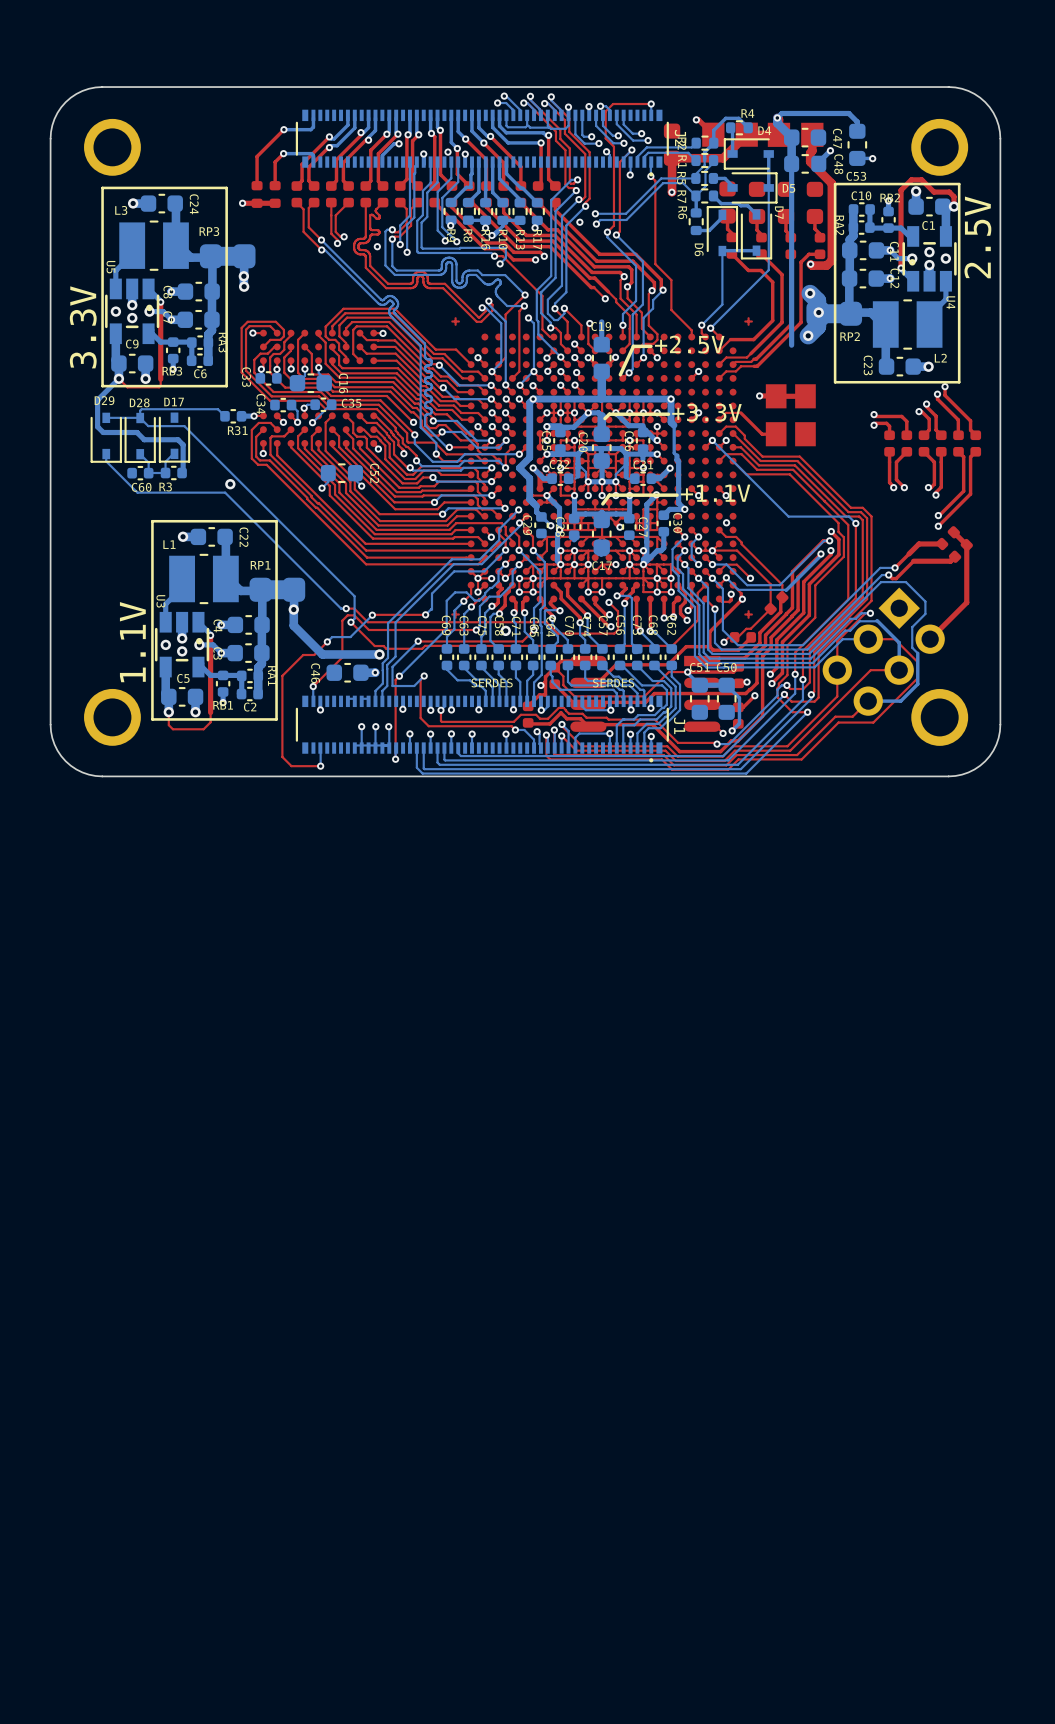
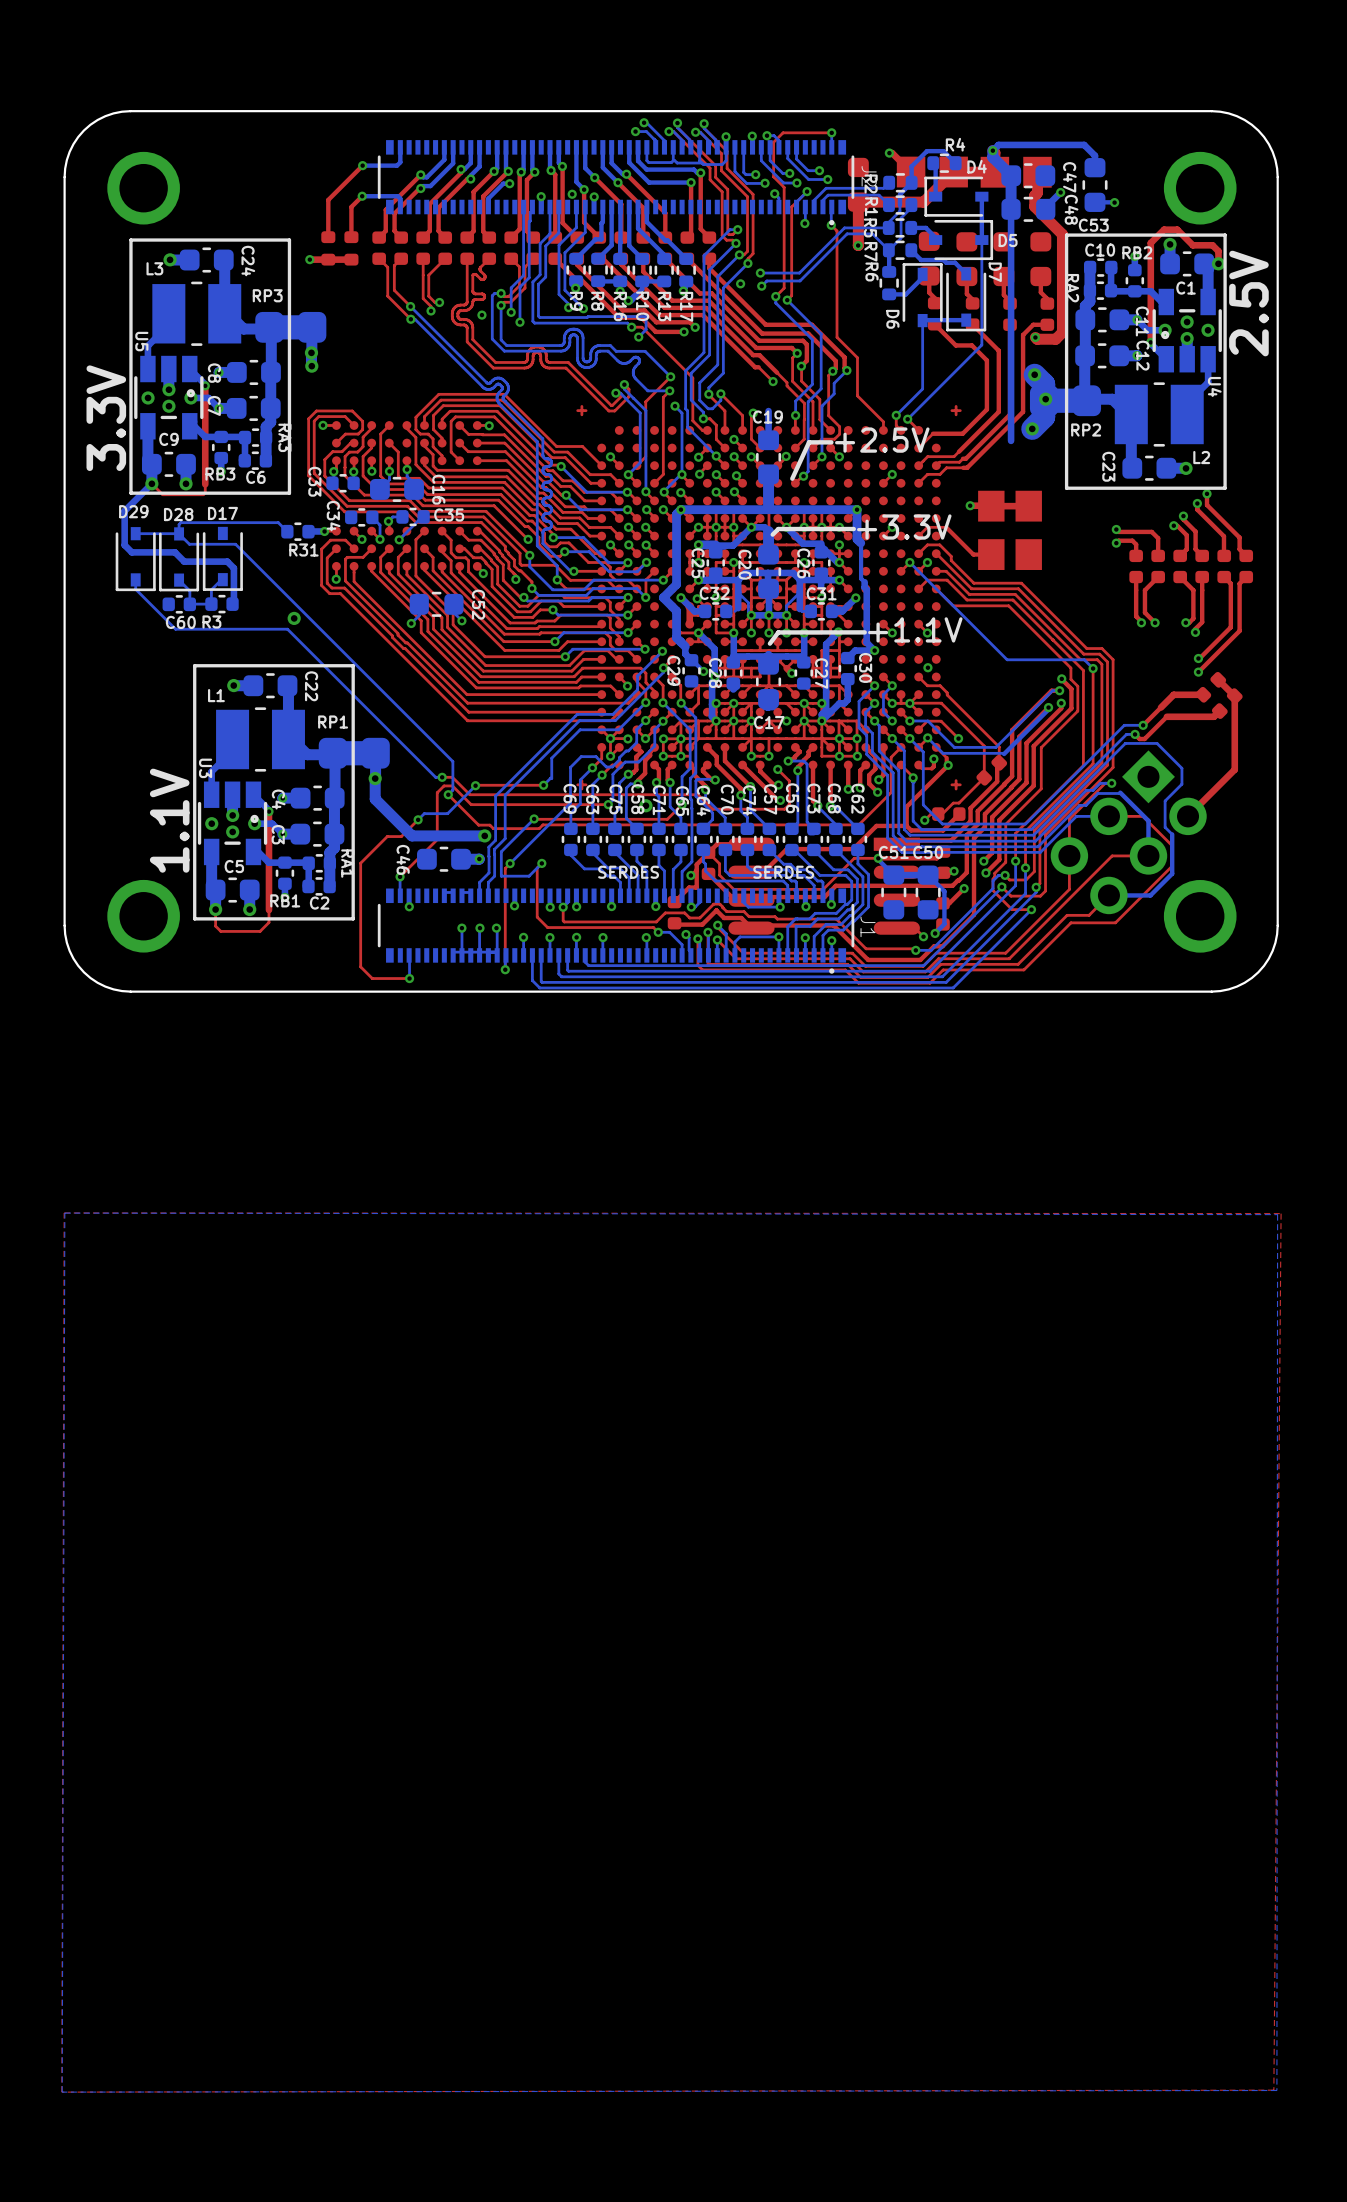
top zone outline: none -> (64, 1212) (61, 2092) (1273, 2090) (1281, 1213) (64, 1212)
bottom zone outline: none -> (64, 1213) (62, 2092) (1276, 2090) (1277, 1214) (64, 1213)

